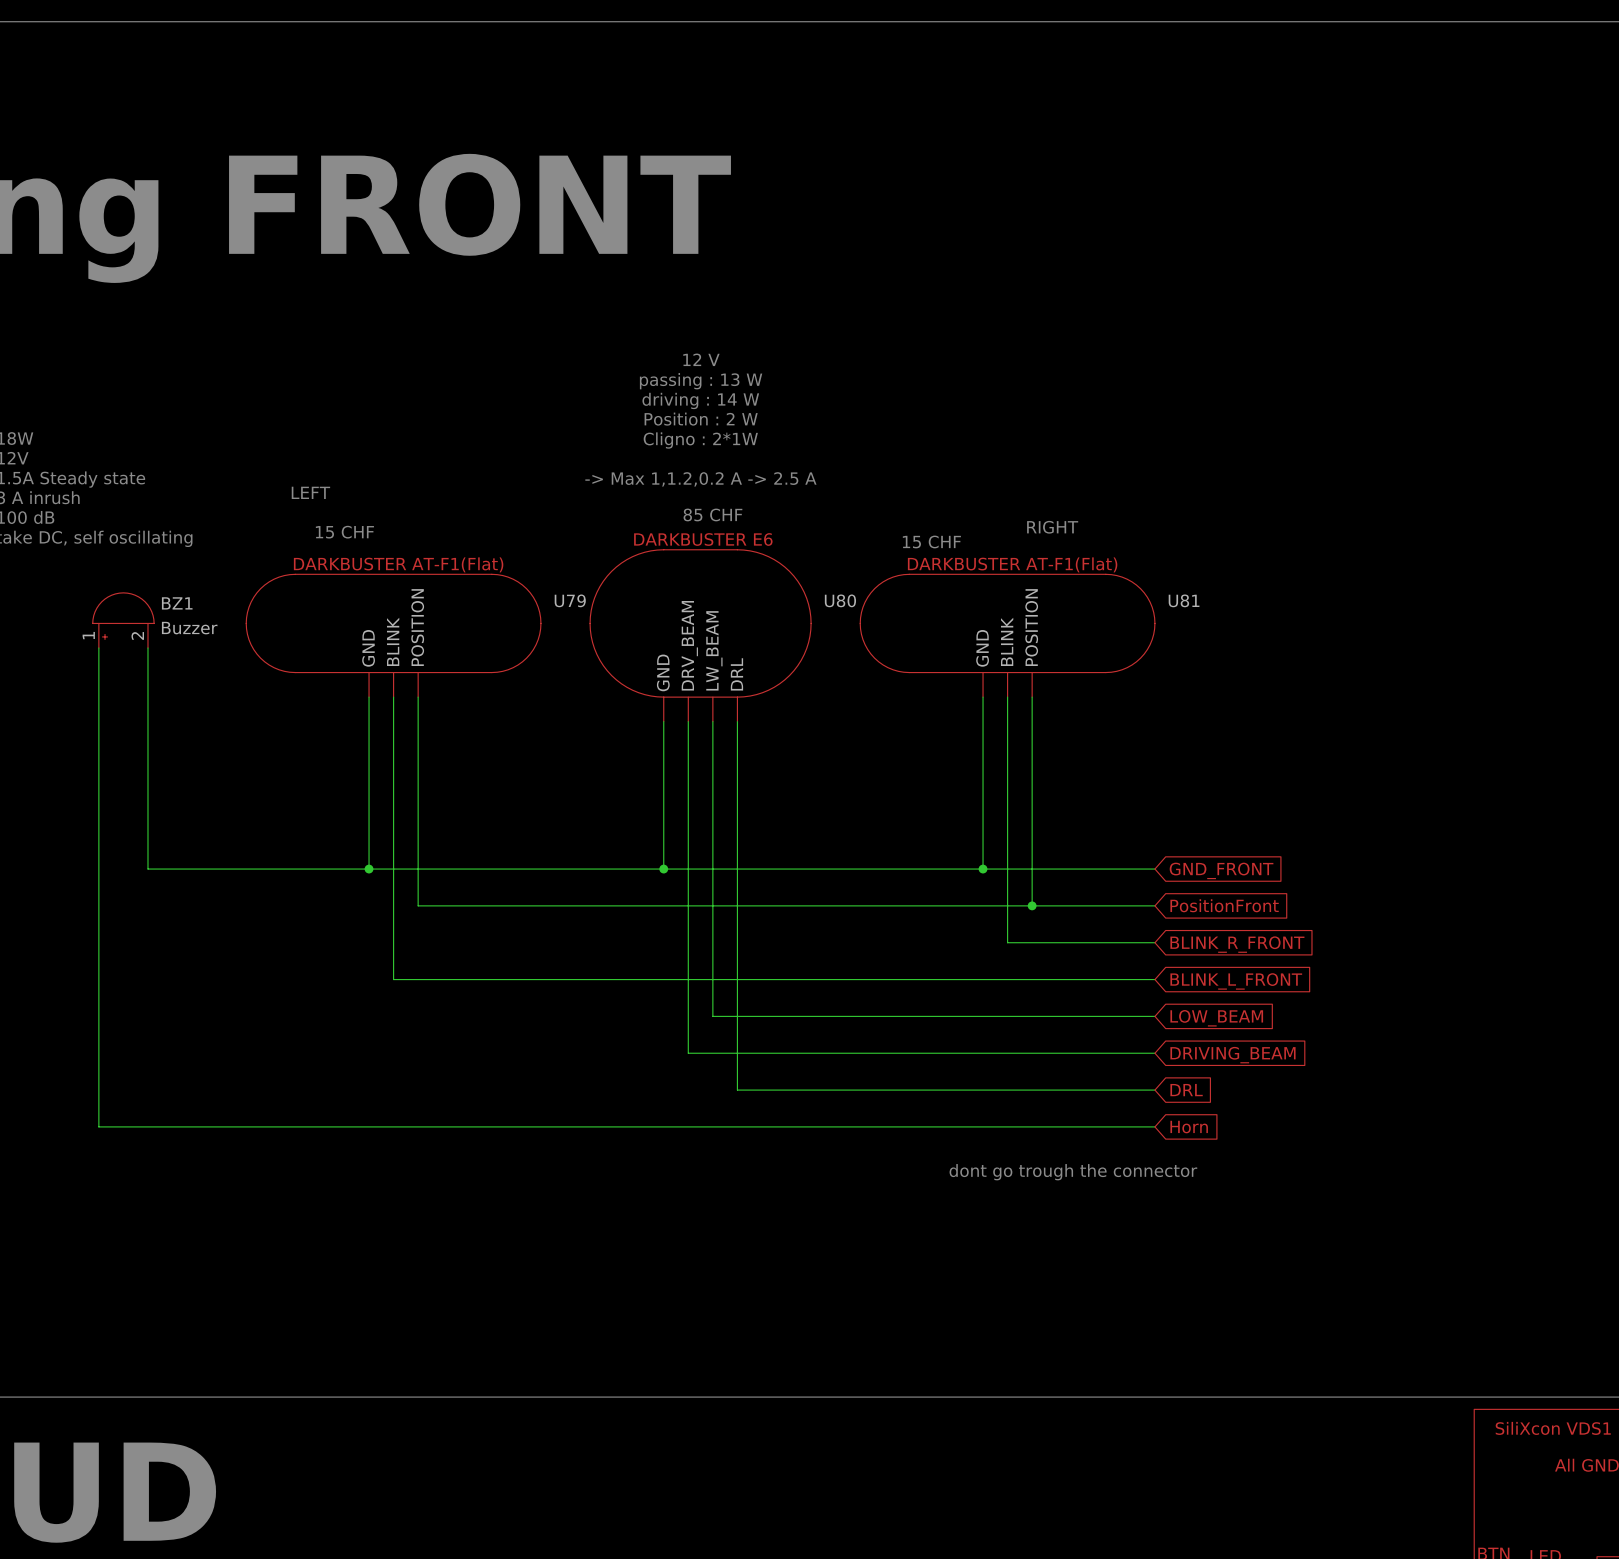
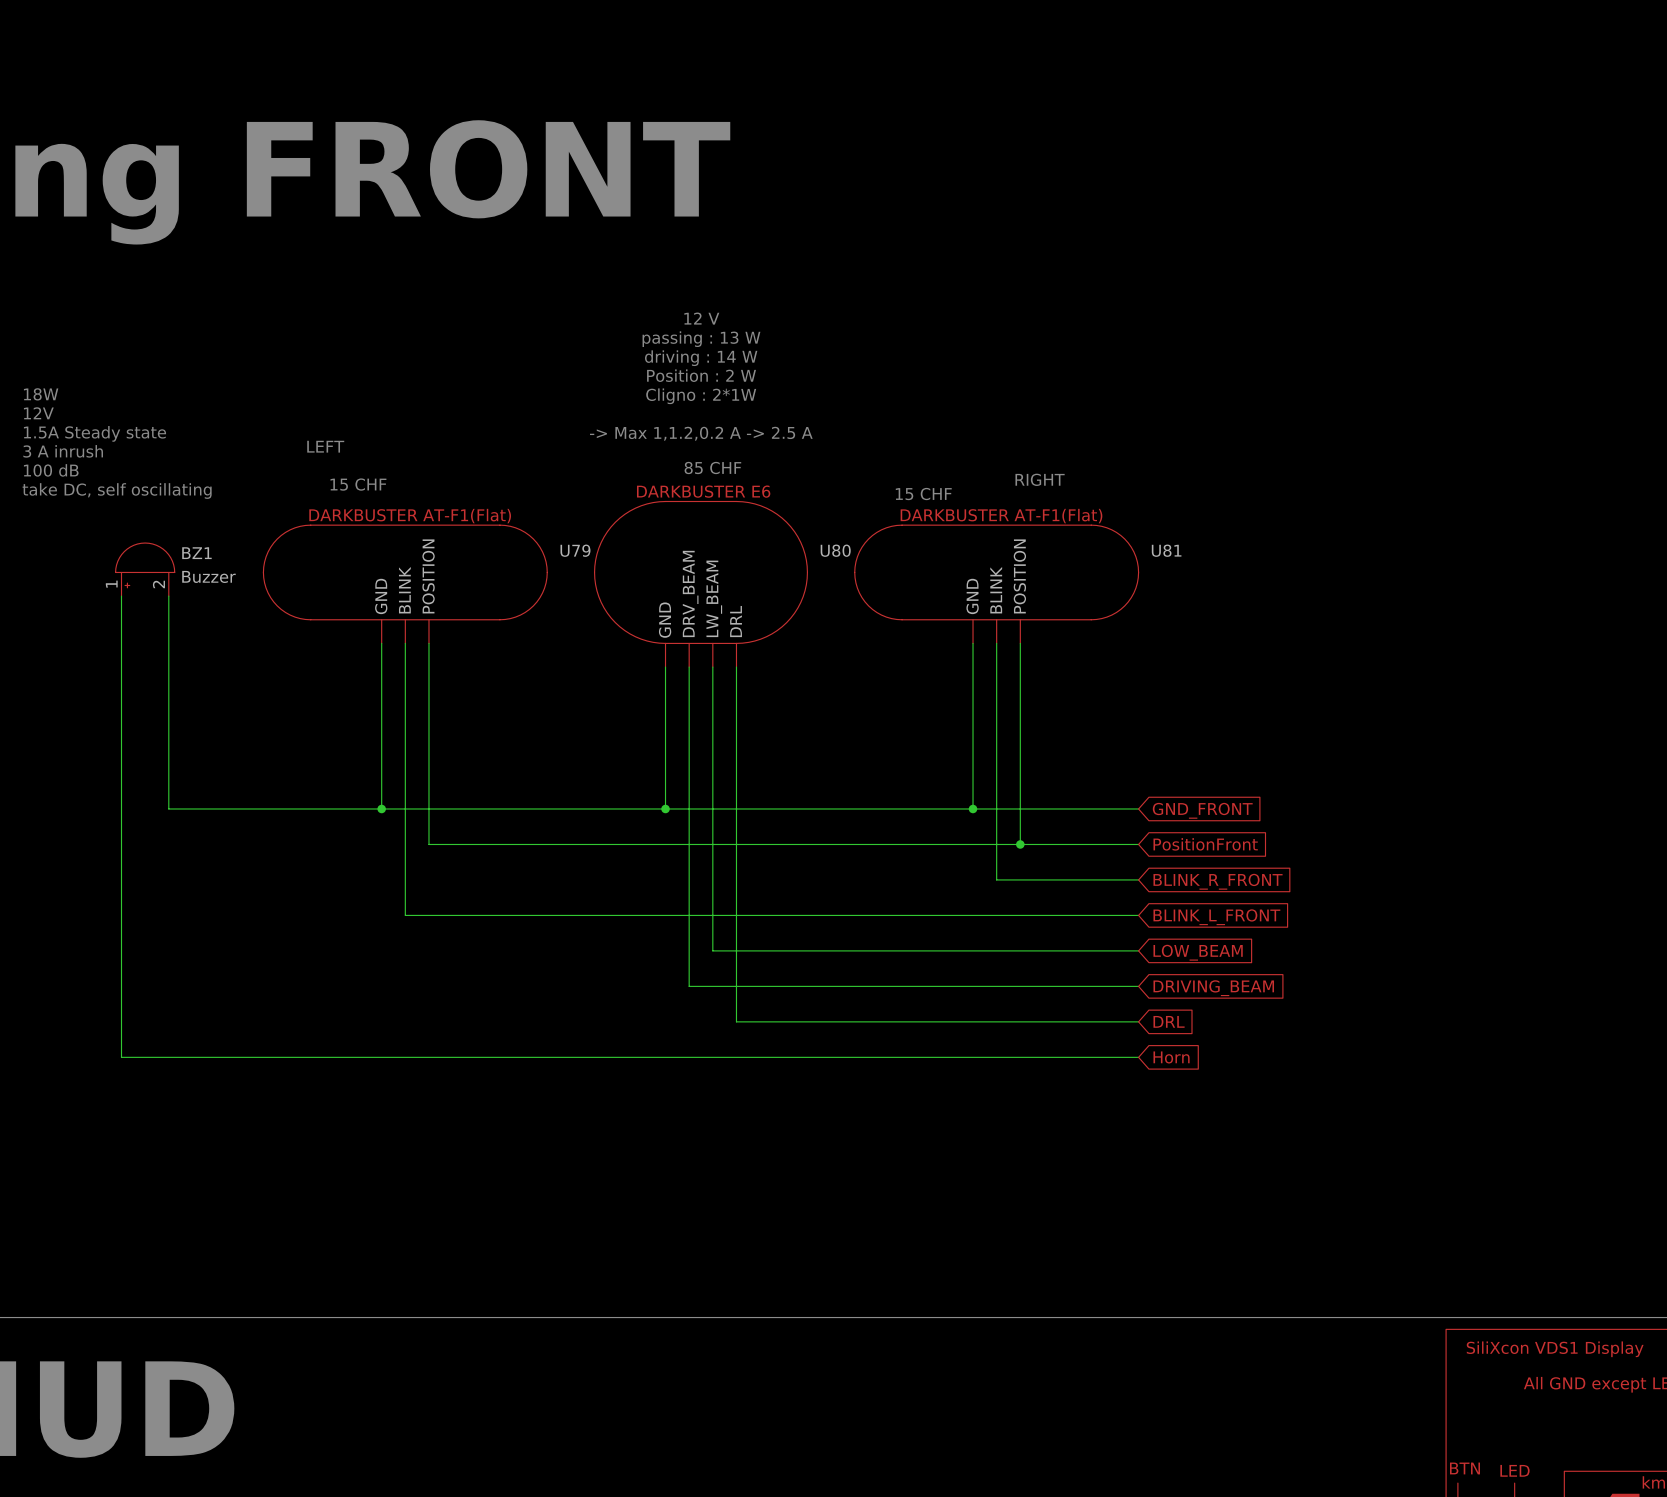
text: dont go trough the connector (1073, 1172) -> none

